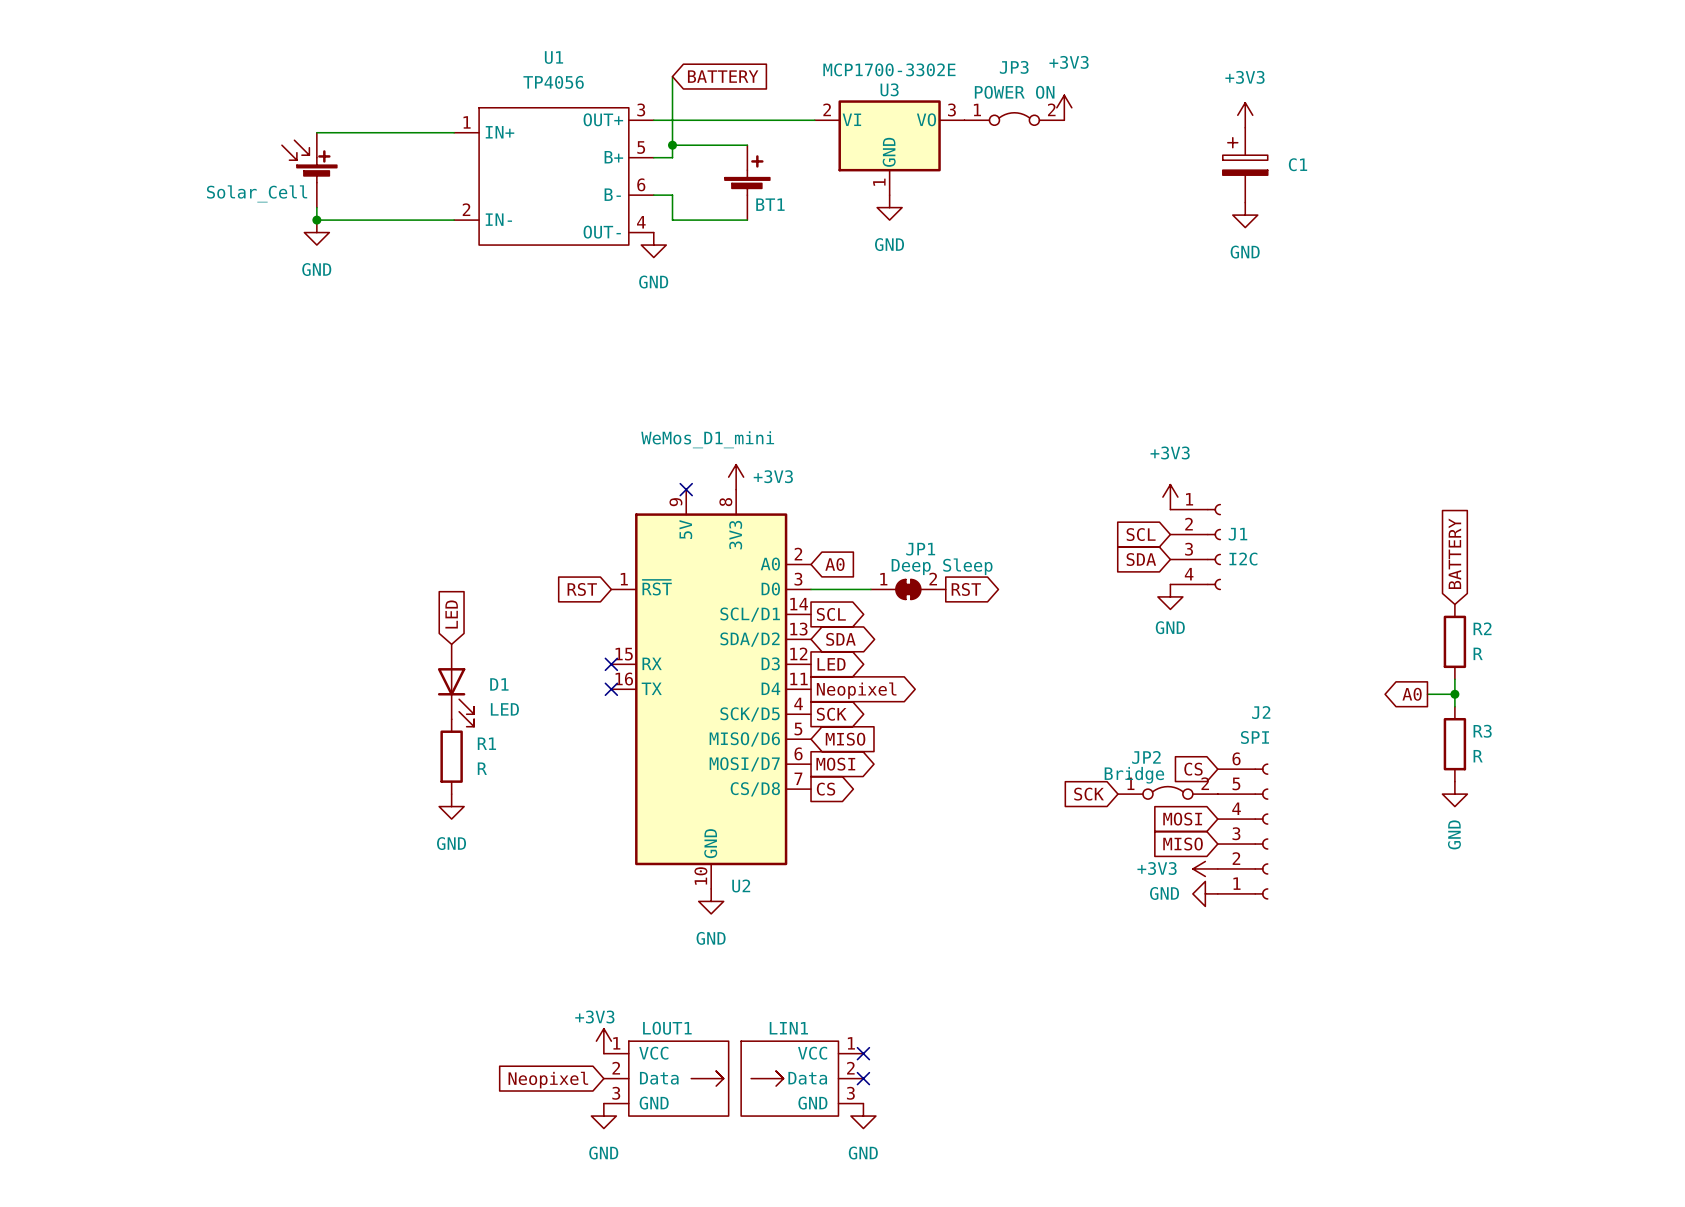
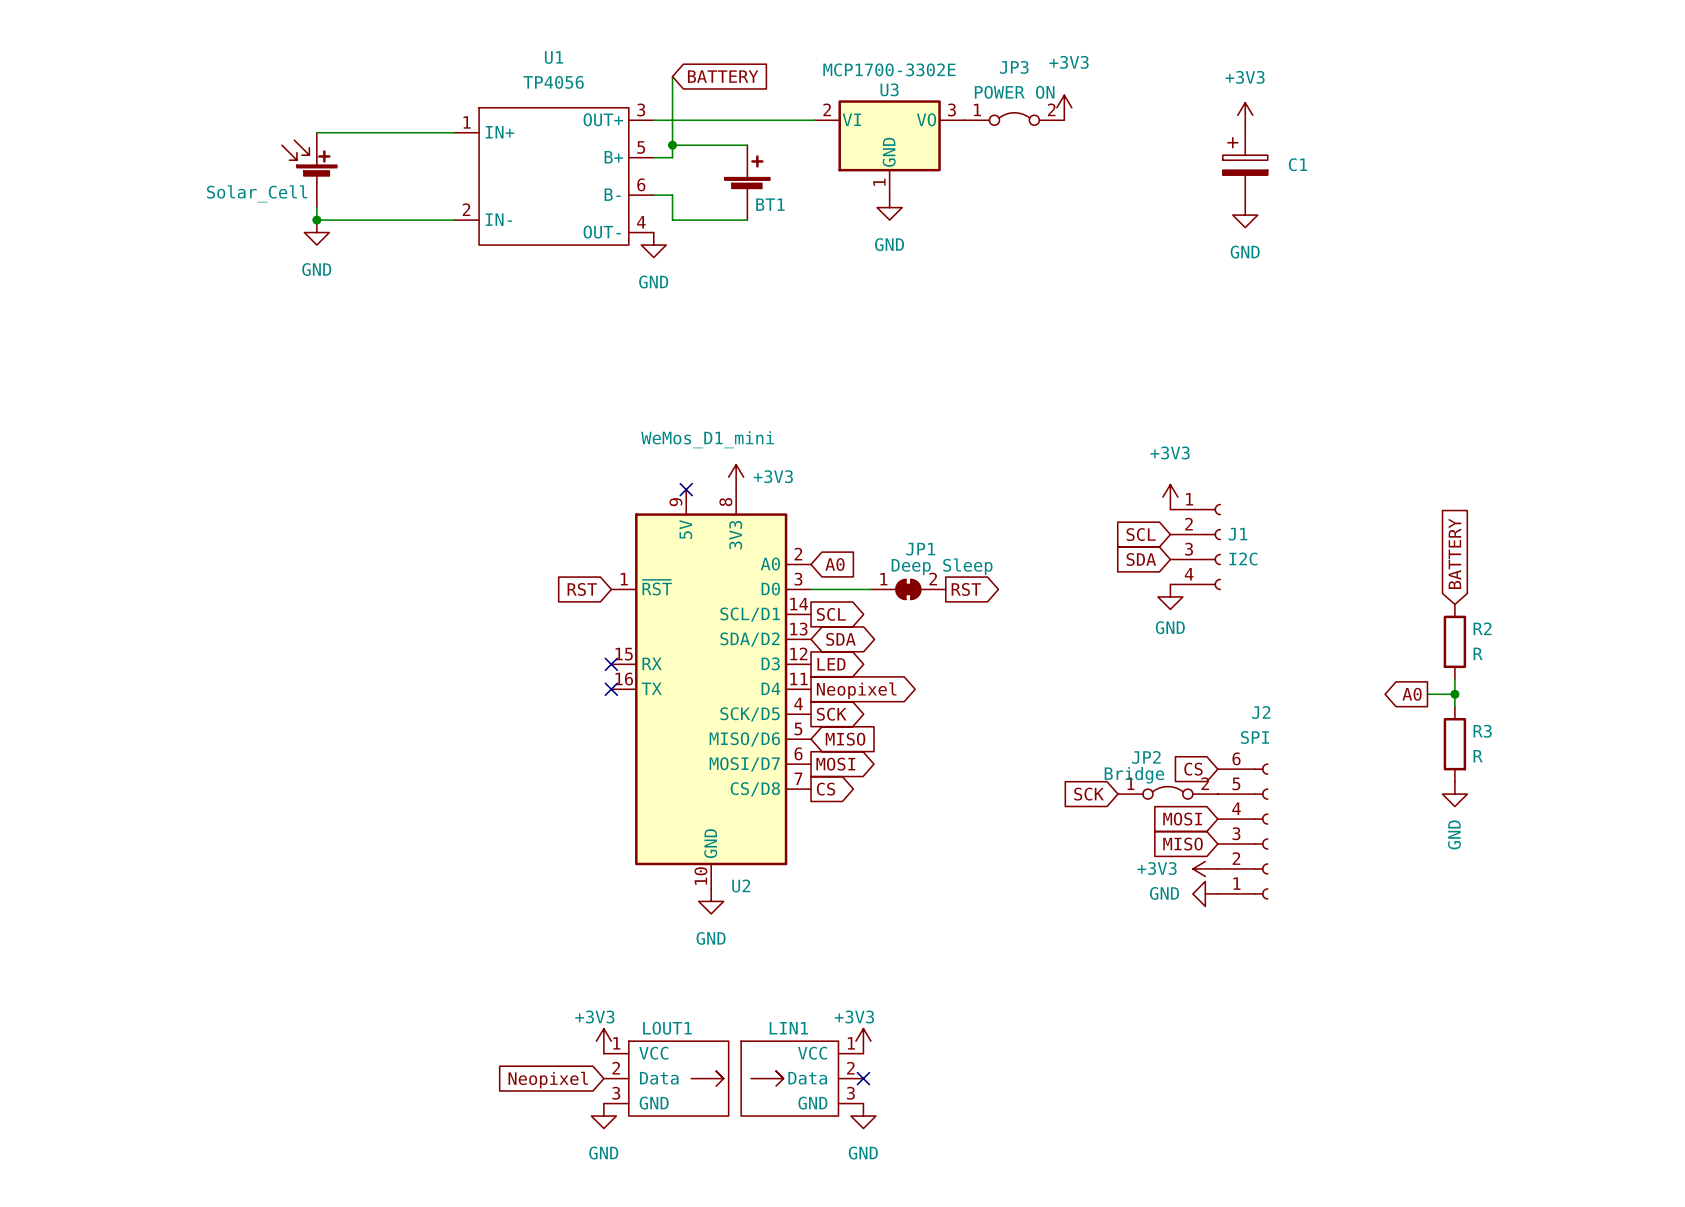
global label: LED (451, 614) -> none
D1: LED (456, 685) -> none
R1: R (451, 756) -> none
power symbol: GND (451, 806) -> none
power symbol: none -> +3V3 (863, 1041)
no-connect mark: (863, 1053) -> none

